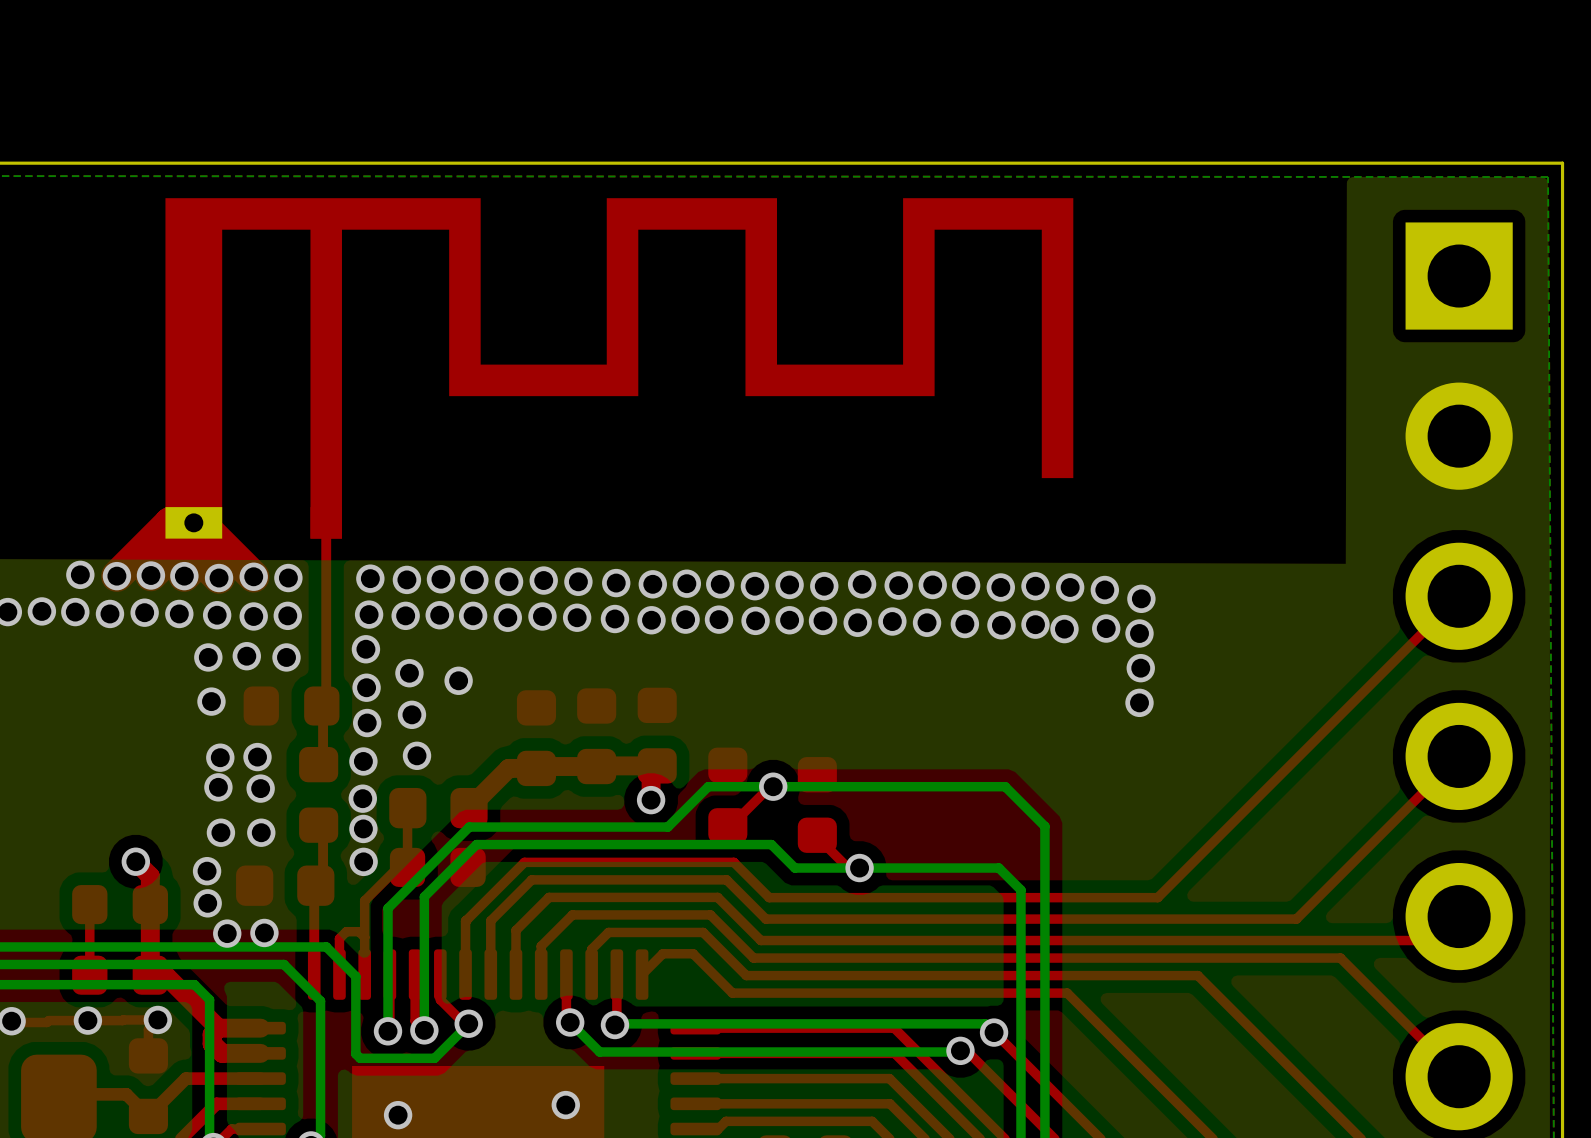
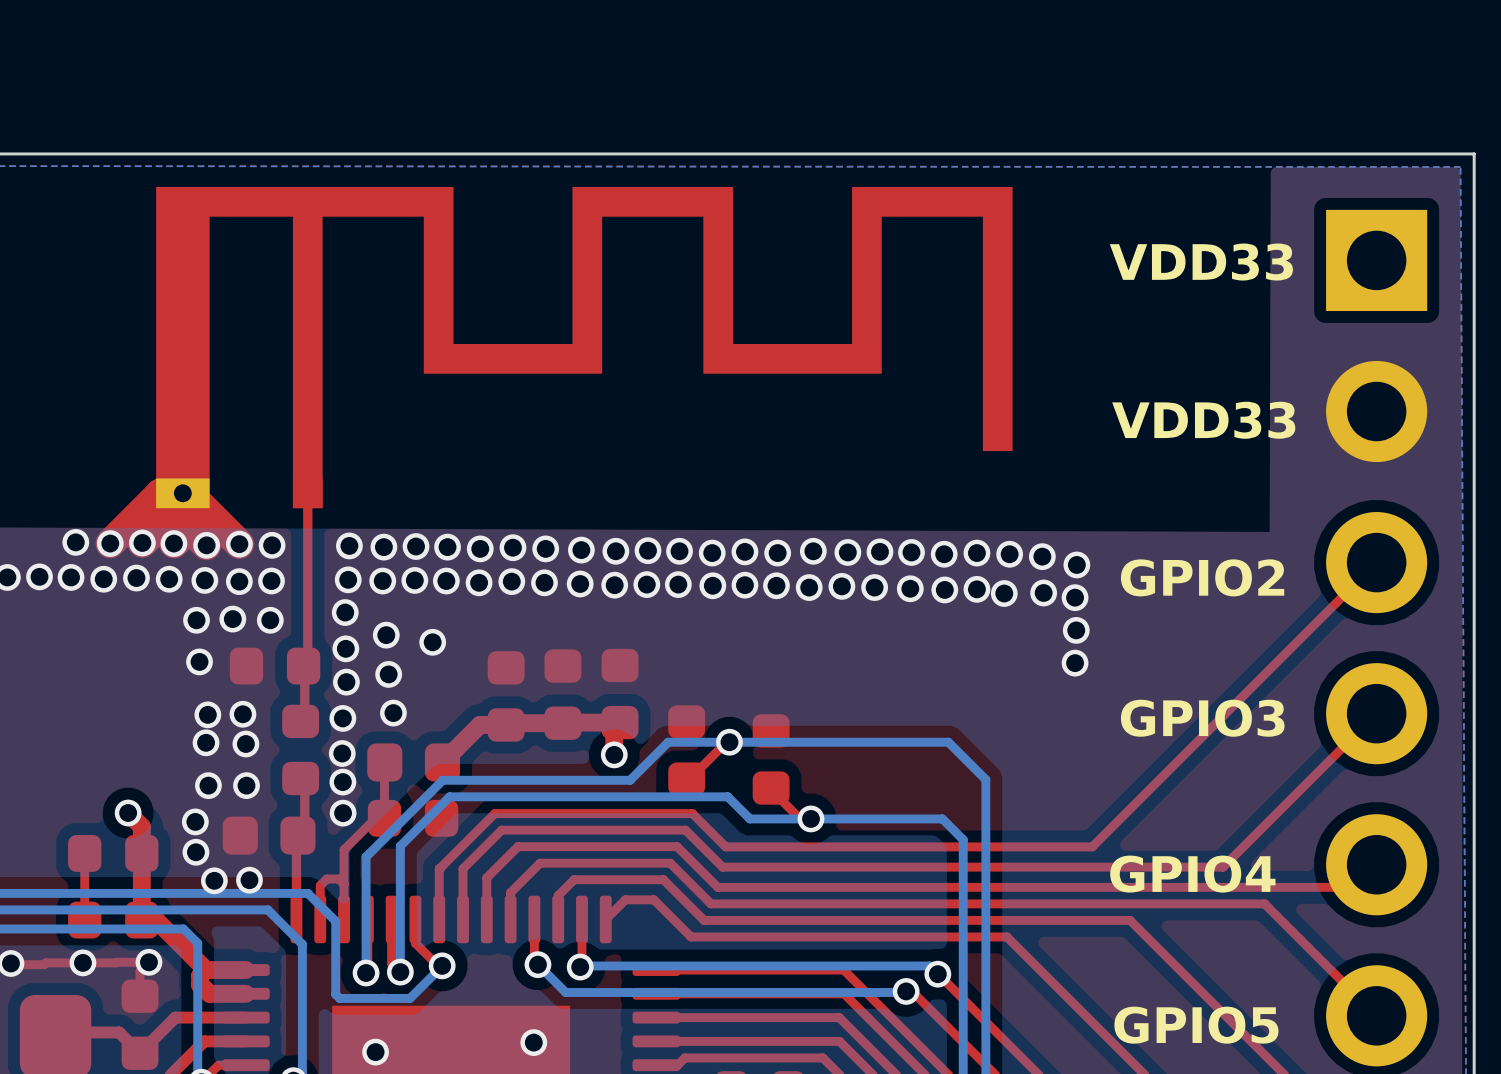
text: none -> VDD33 (1201, 262)
text: none -> VDD33 (1203, 420)
text: none -> GPIO2 (1202, 577)
text: none -> GPIO3 (1202, 718)
text: none -> GPIO4 (1192, 874)
text: none -> GPIO5 (1196, 1025)

